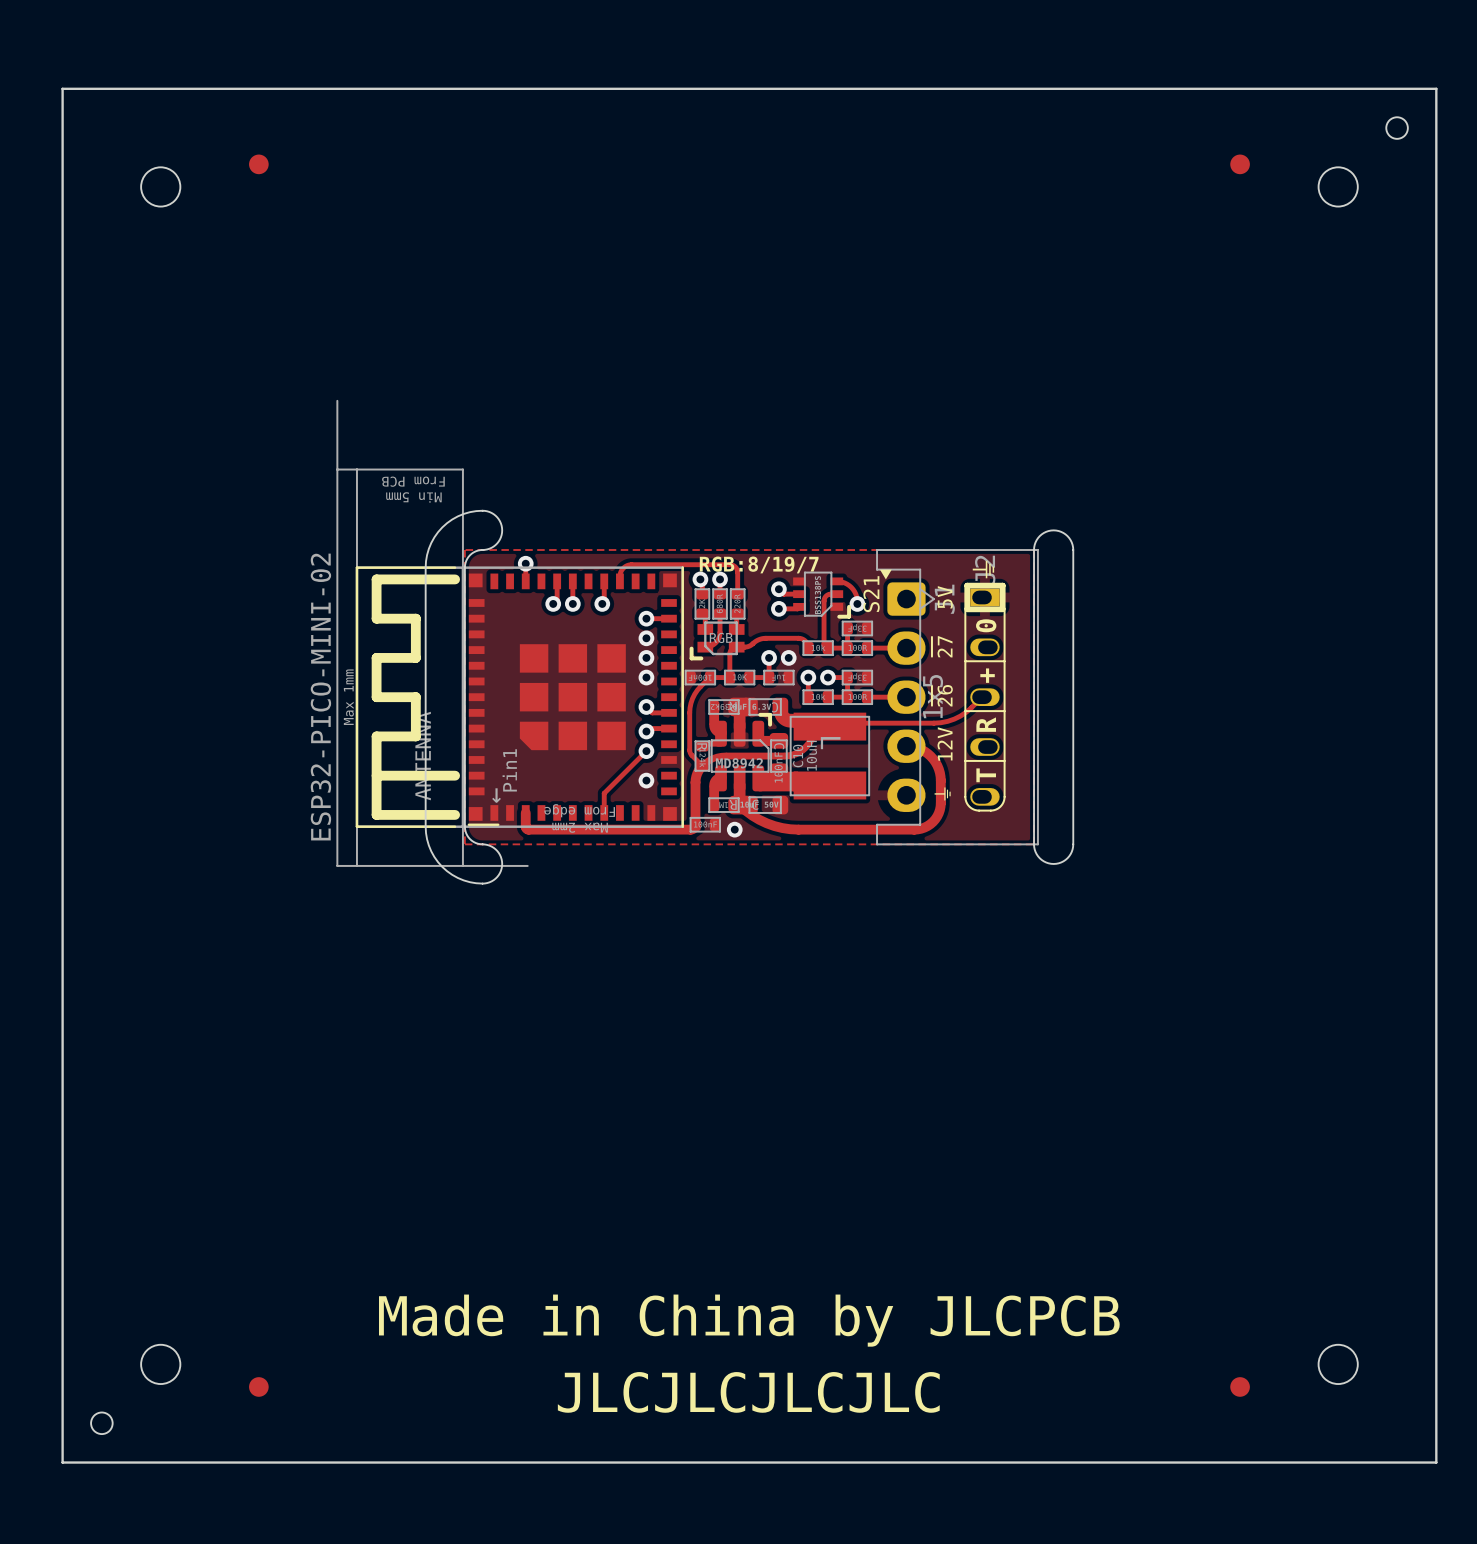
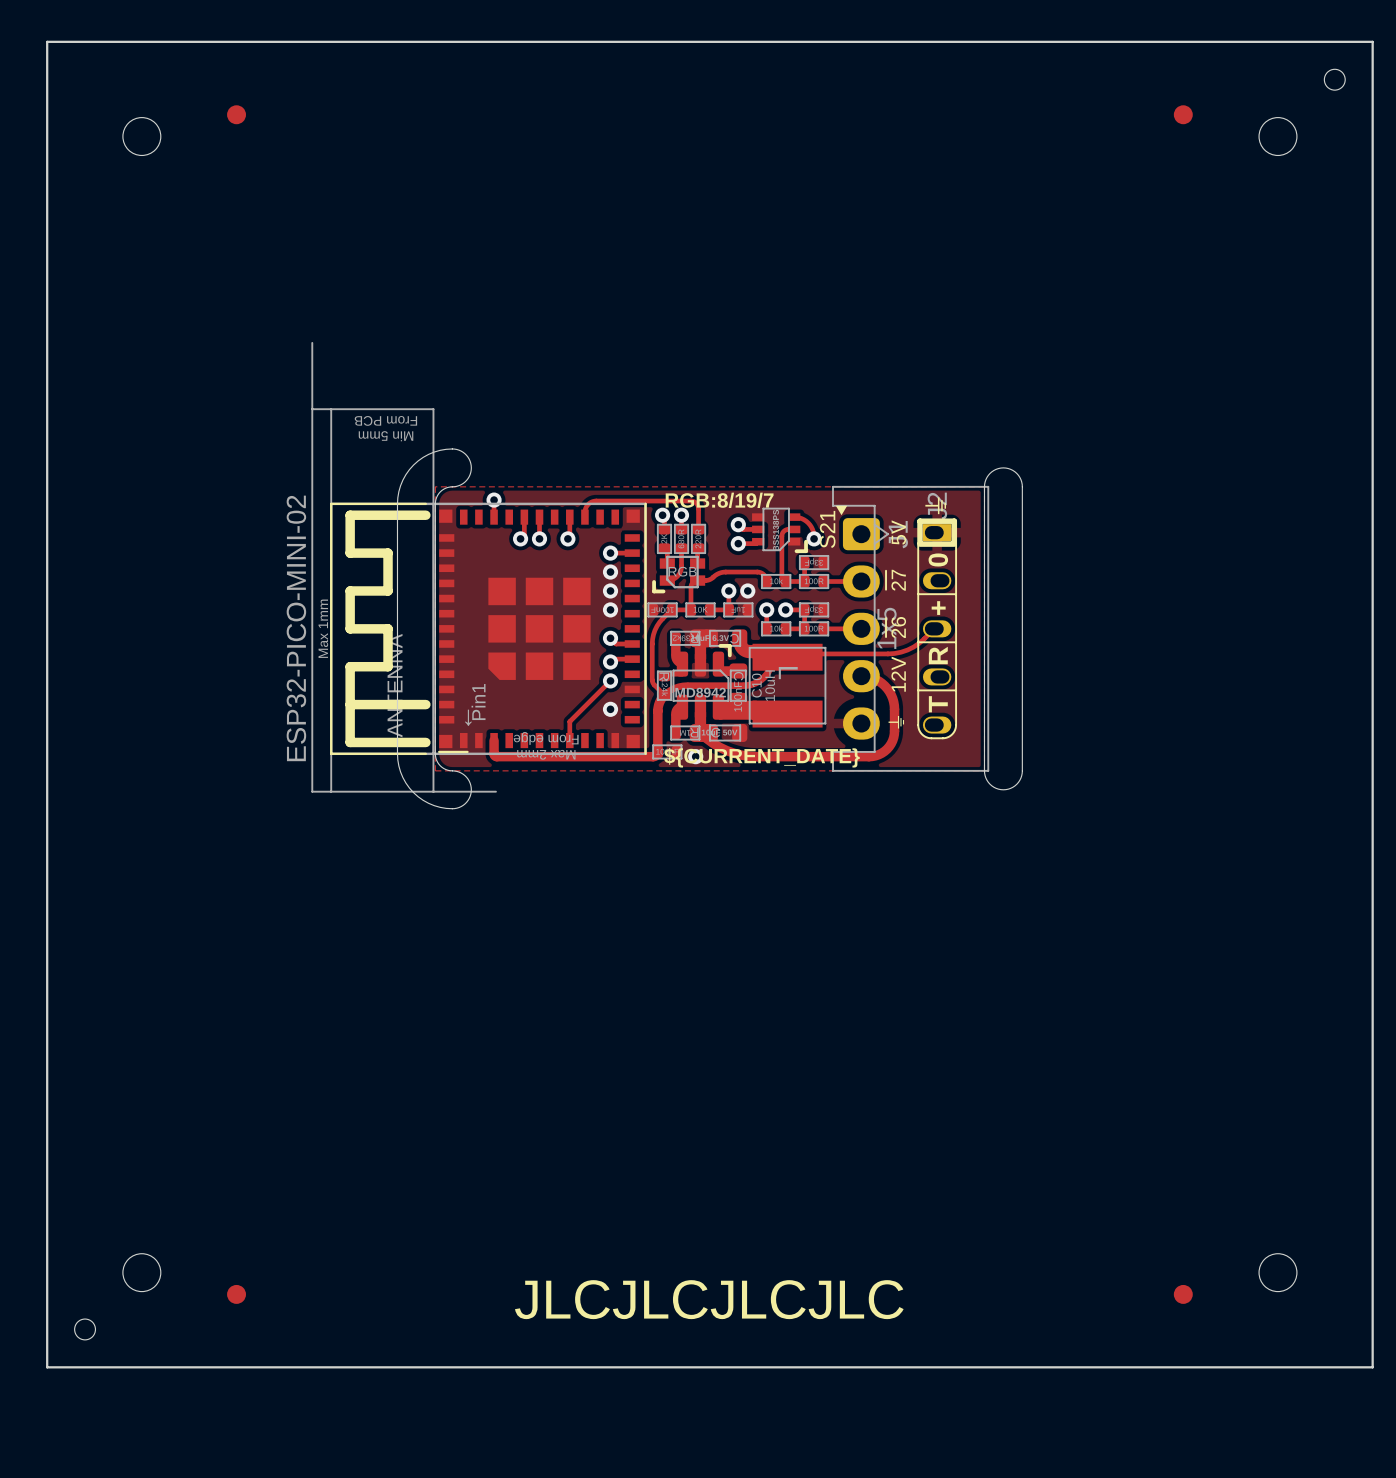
text: none -> ${CURRENT_DATE} (761, 757)
text: Made in China by JLCPCB (749, 1320) -> none

